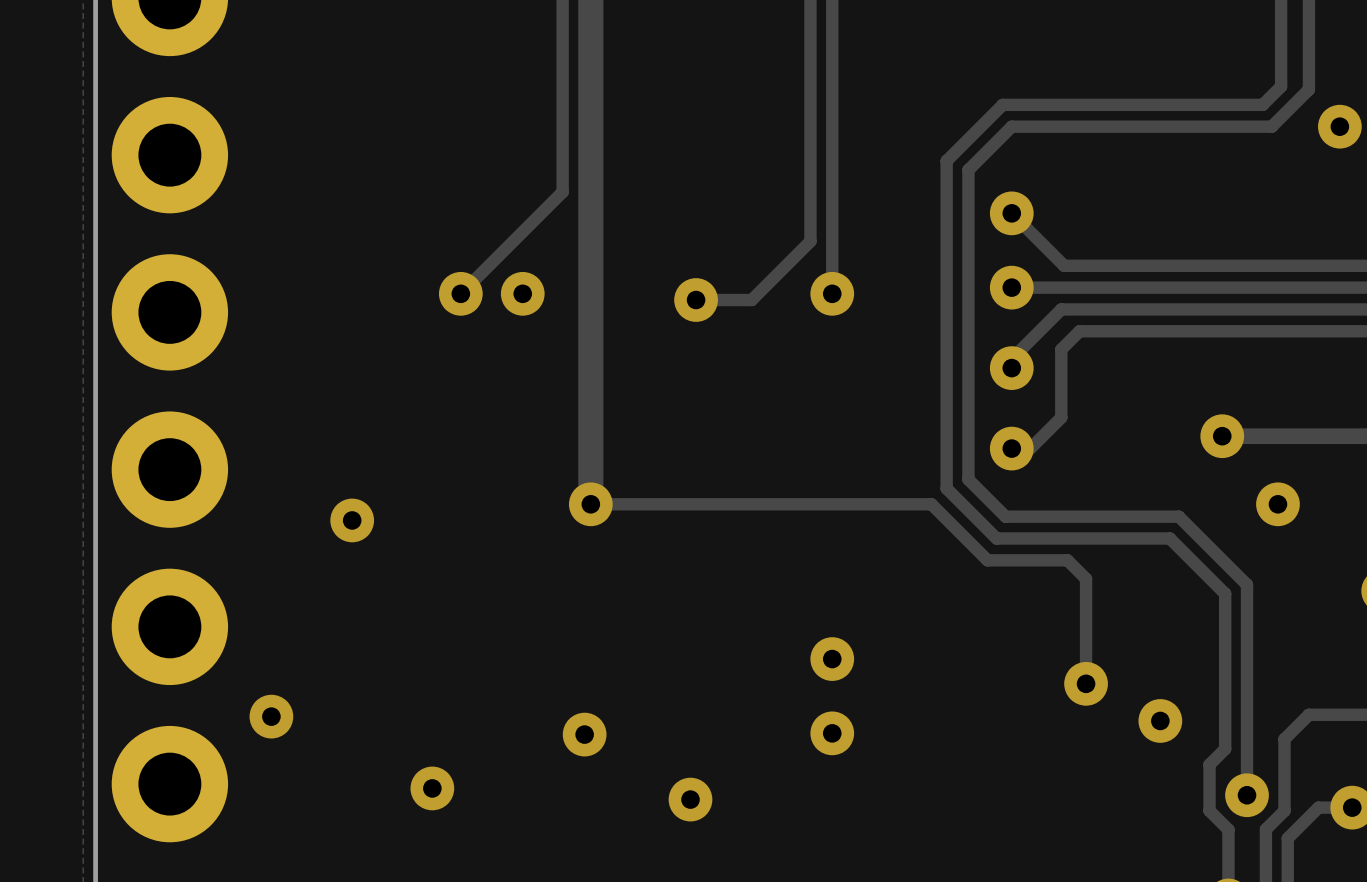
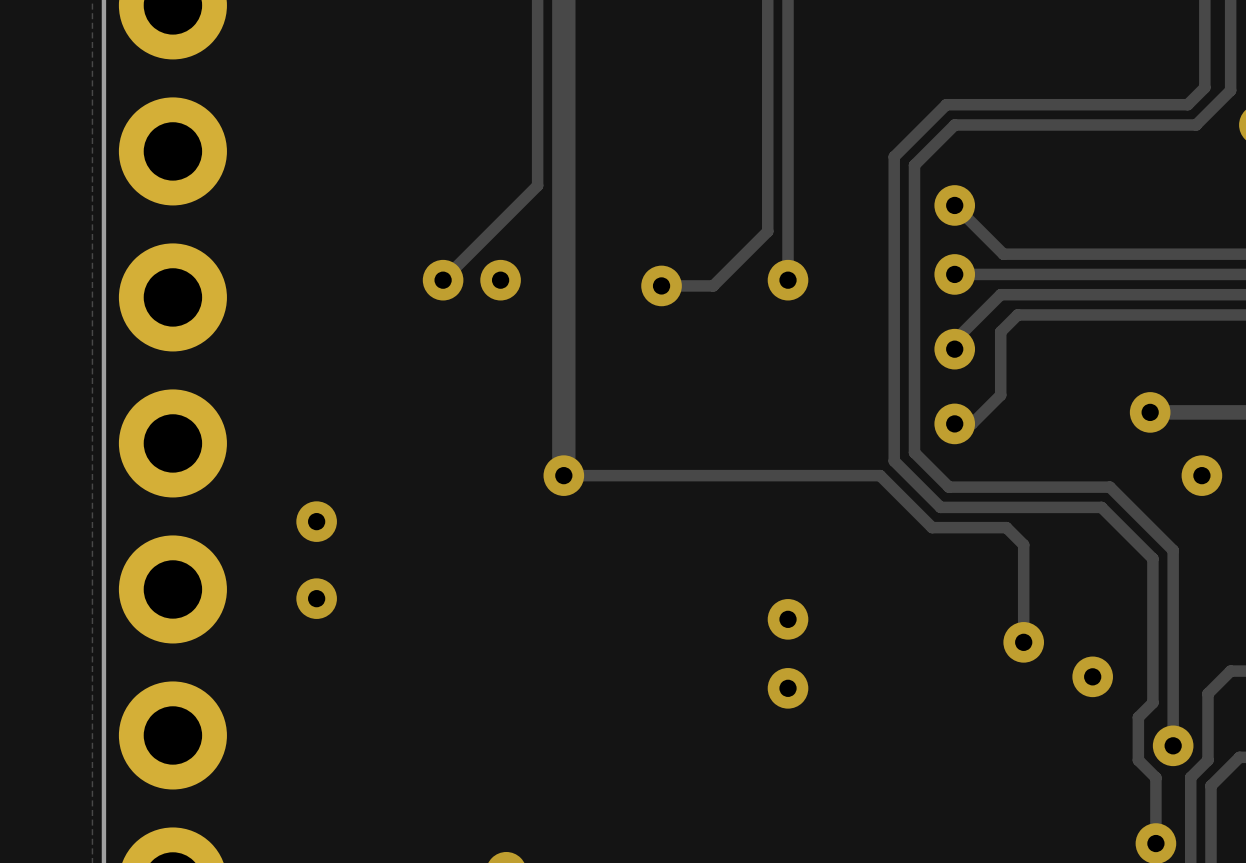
via position: (352, 520) -> (316, 521)
via: none -> (316, 598)
via: (271, 716) -> none
via: (584, 734) -> none
via: (432, 788) -> none
via: (690, 799) -> none

